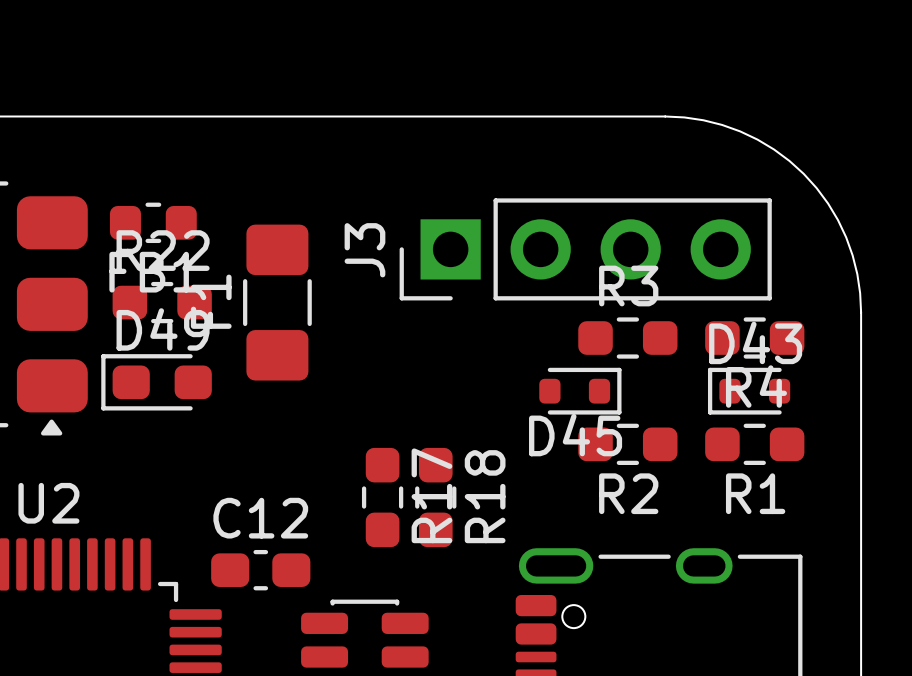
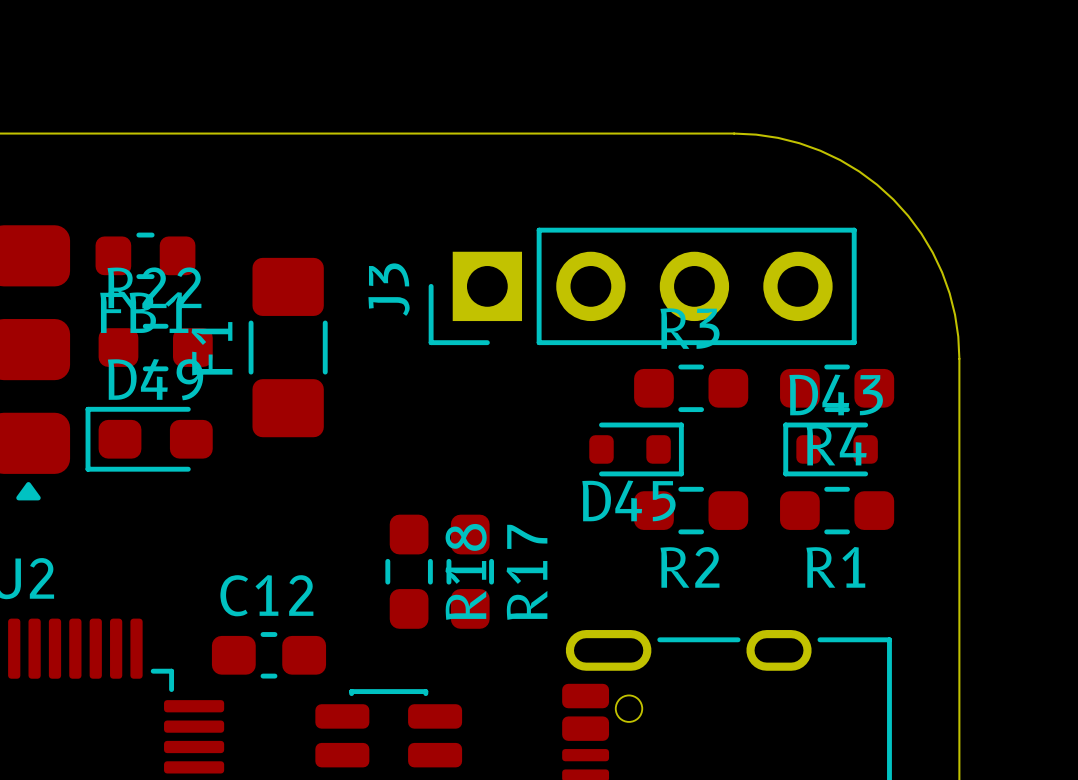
R17 name: R17 (431, 495) -> R18 (466, 571)
R18 name: R18 (485, 496) -> R17 (527, 572)

